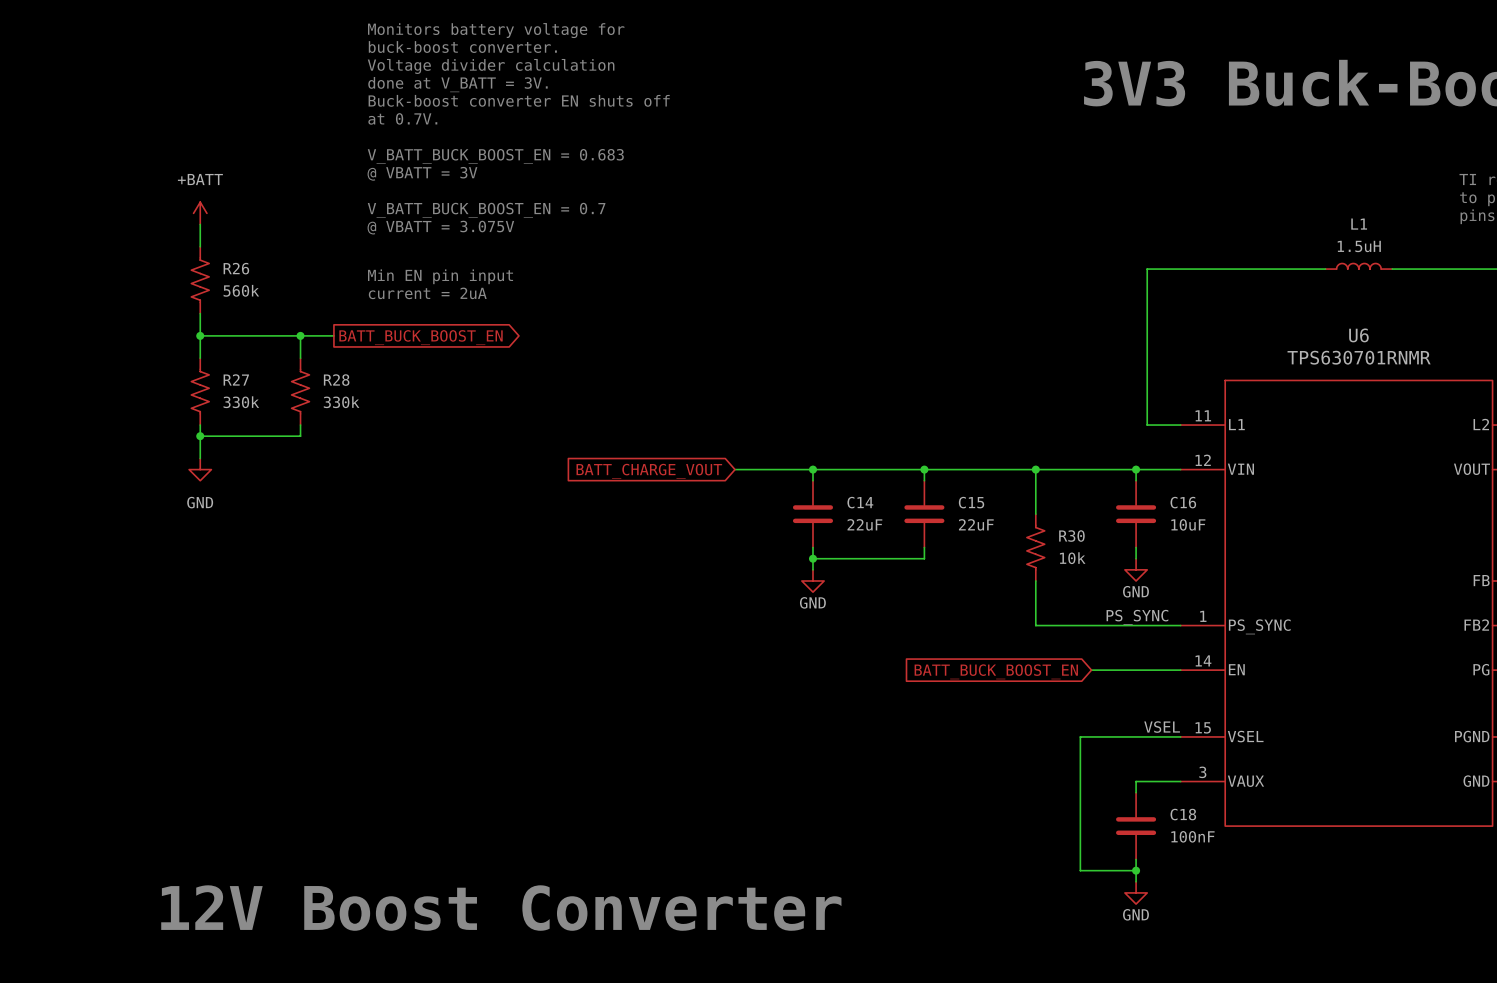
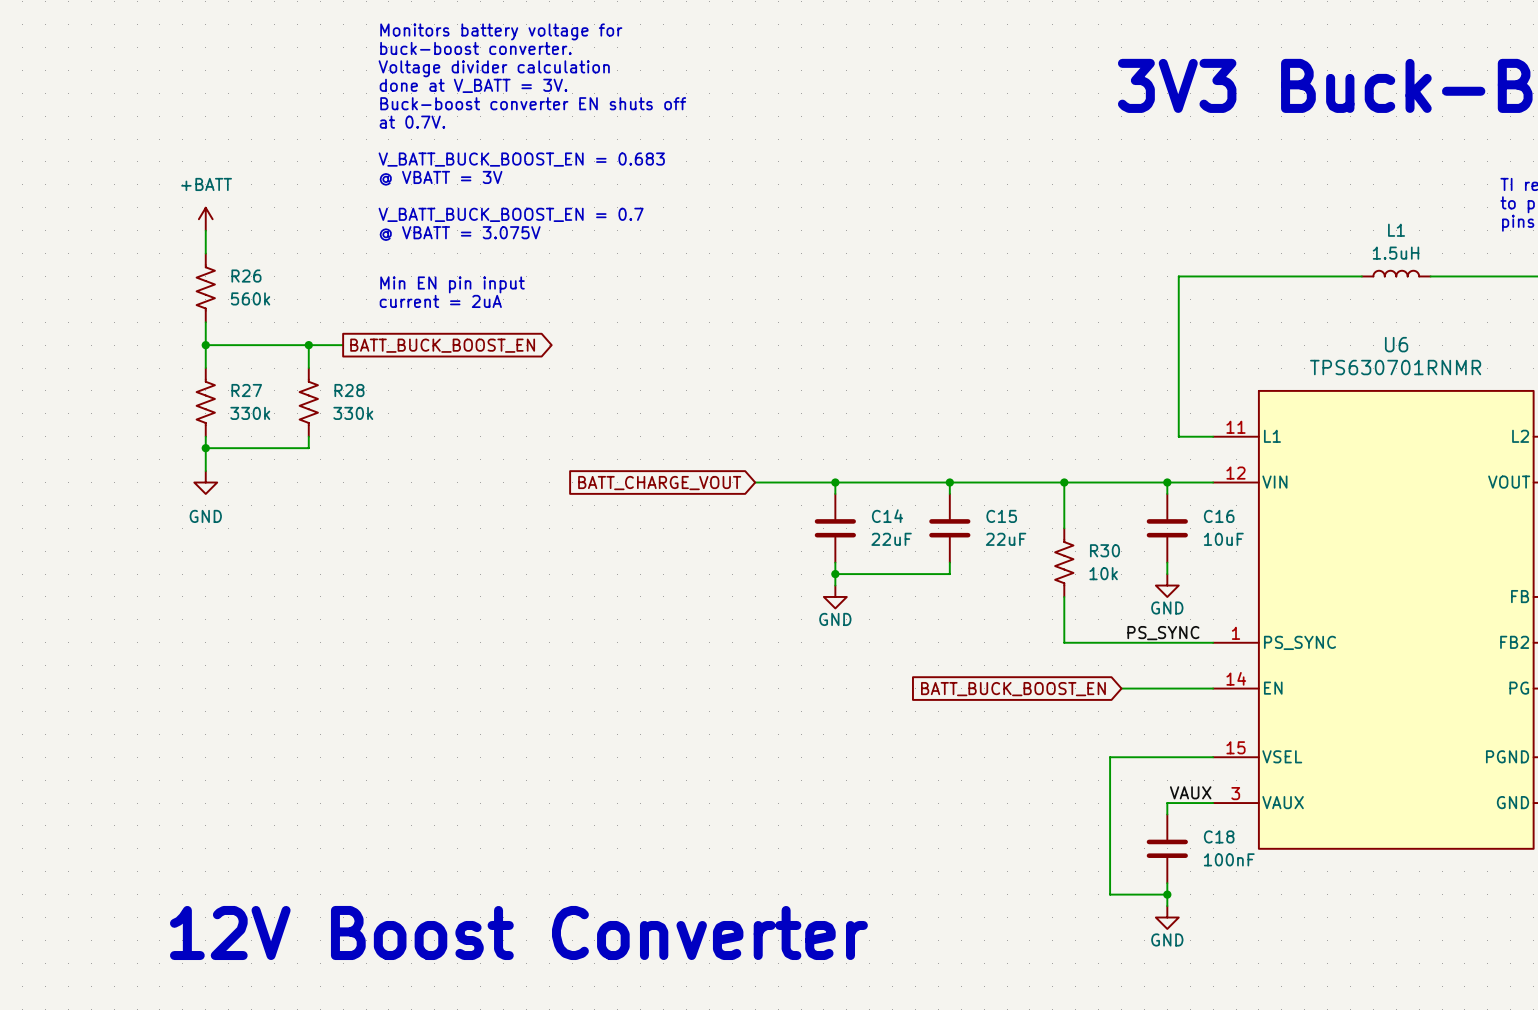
label: VSEL (1162, 727) -> none
label: none -> VAUX (1190, 792)

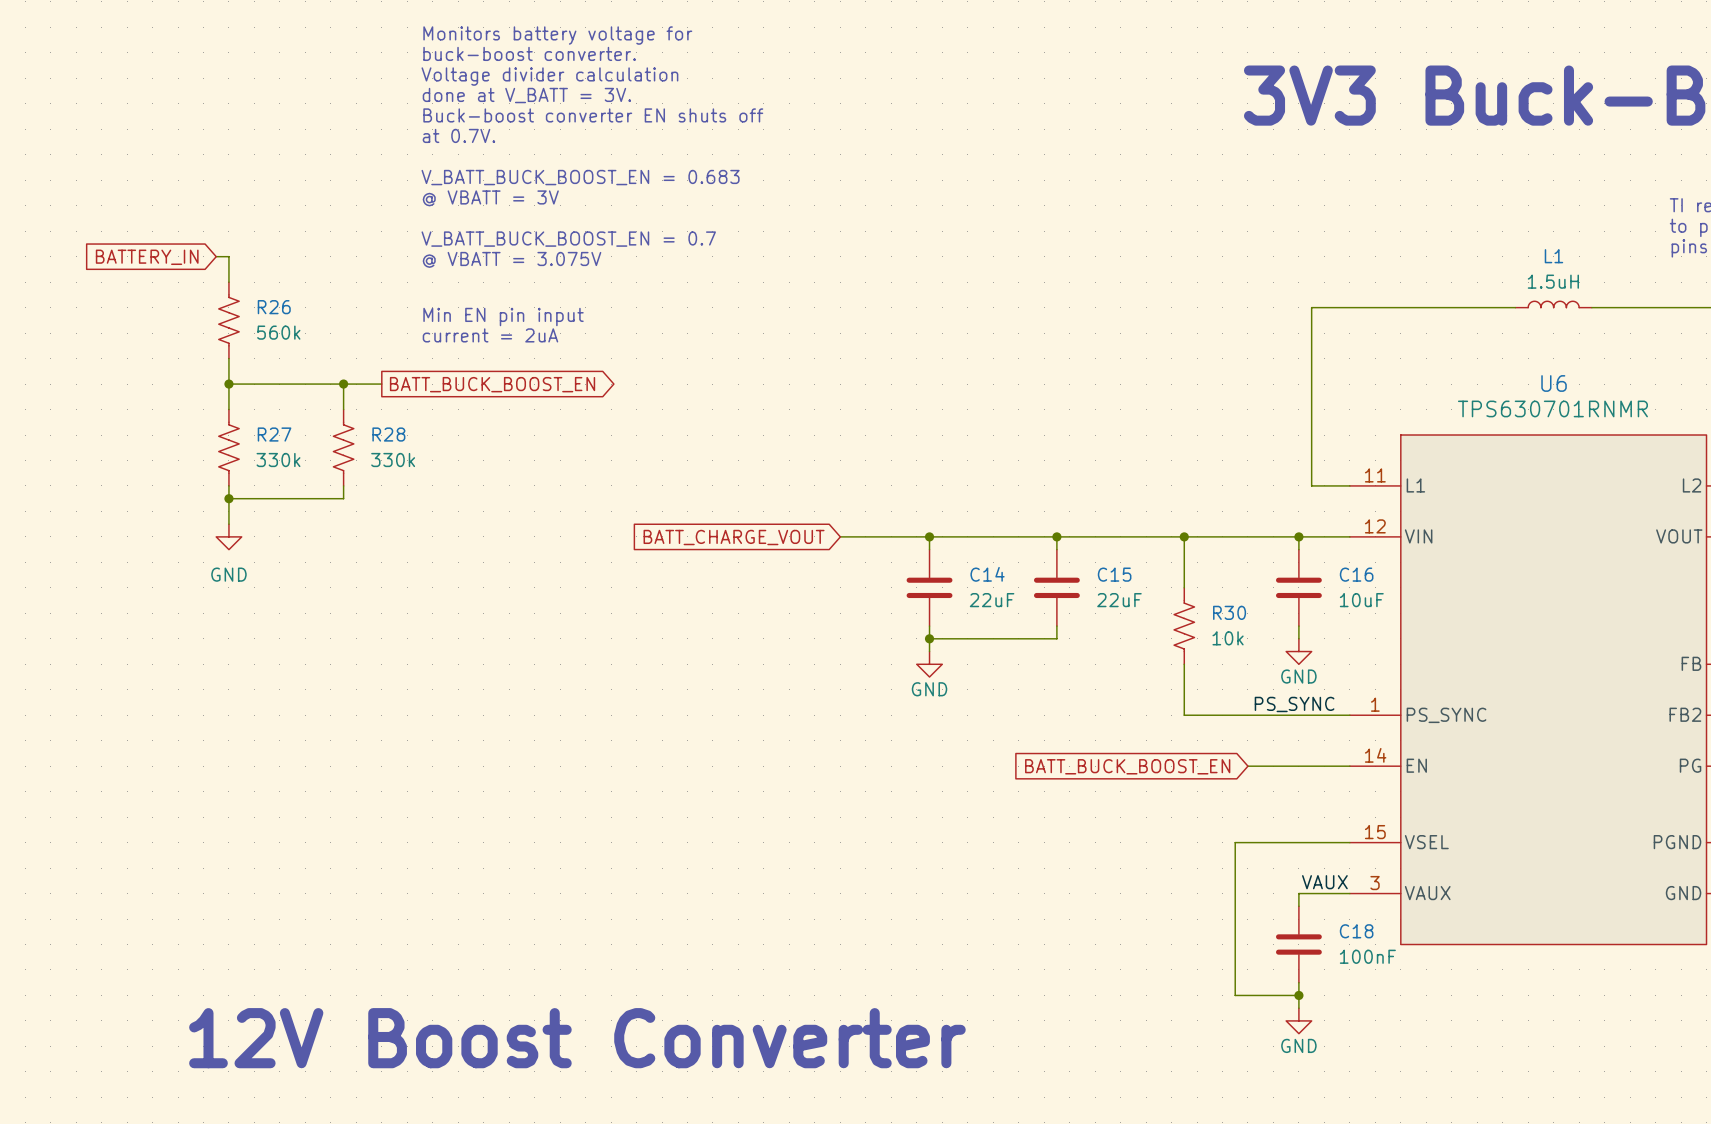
power symbol: +BATT (205, 219) -> none
wire: none -> (216, 256) (228, 256)
global label: none -> BATTERY_IN (147, 257)

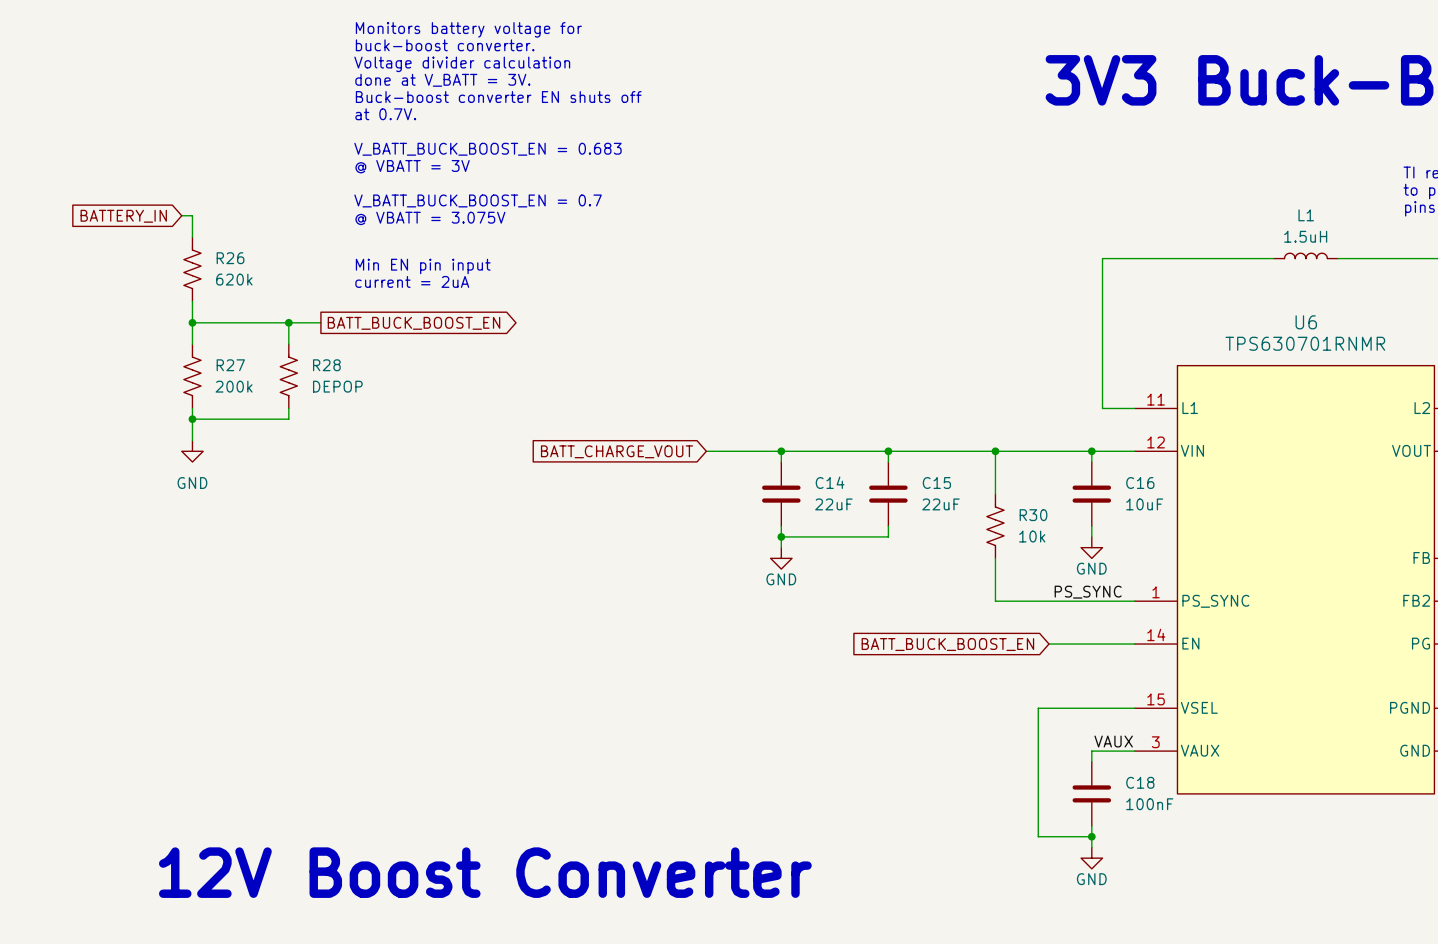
R26 value: 560k (278, 332) -> 620k (234, 279)
R27 value: 330k (278, 460) -> 200k (234, 386)
R28 value: 330k (393, 460) -> DEPOP (337, 386)

